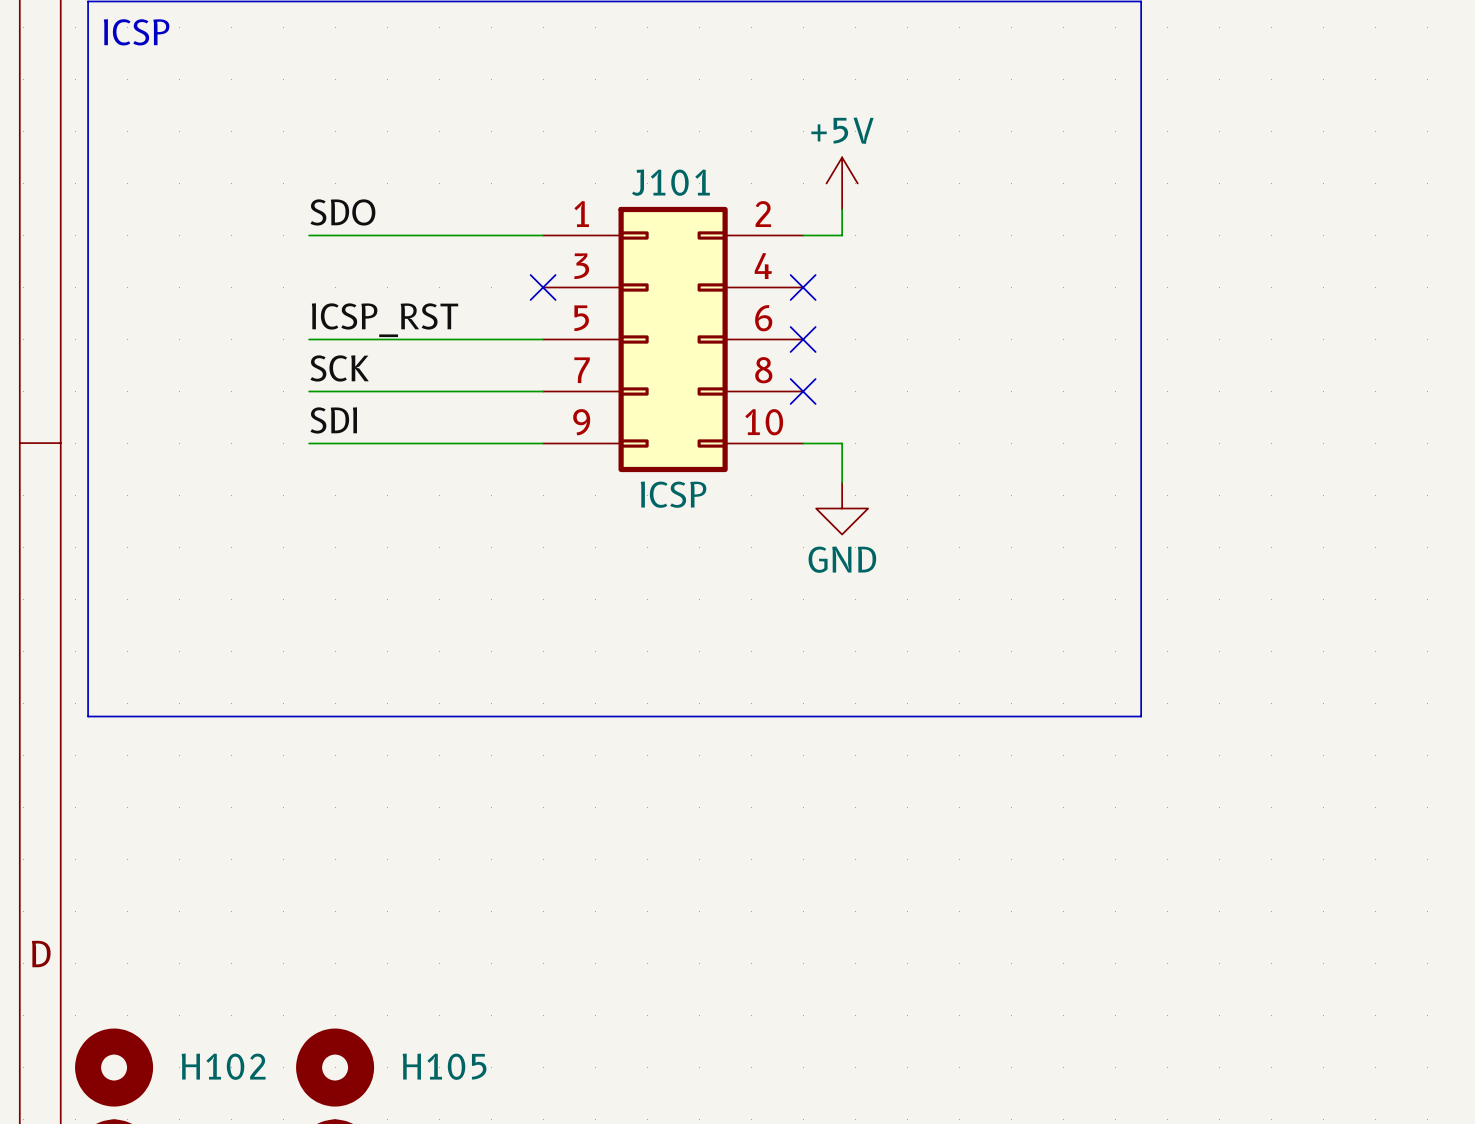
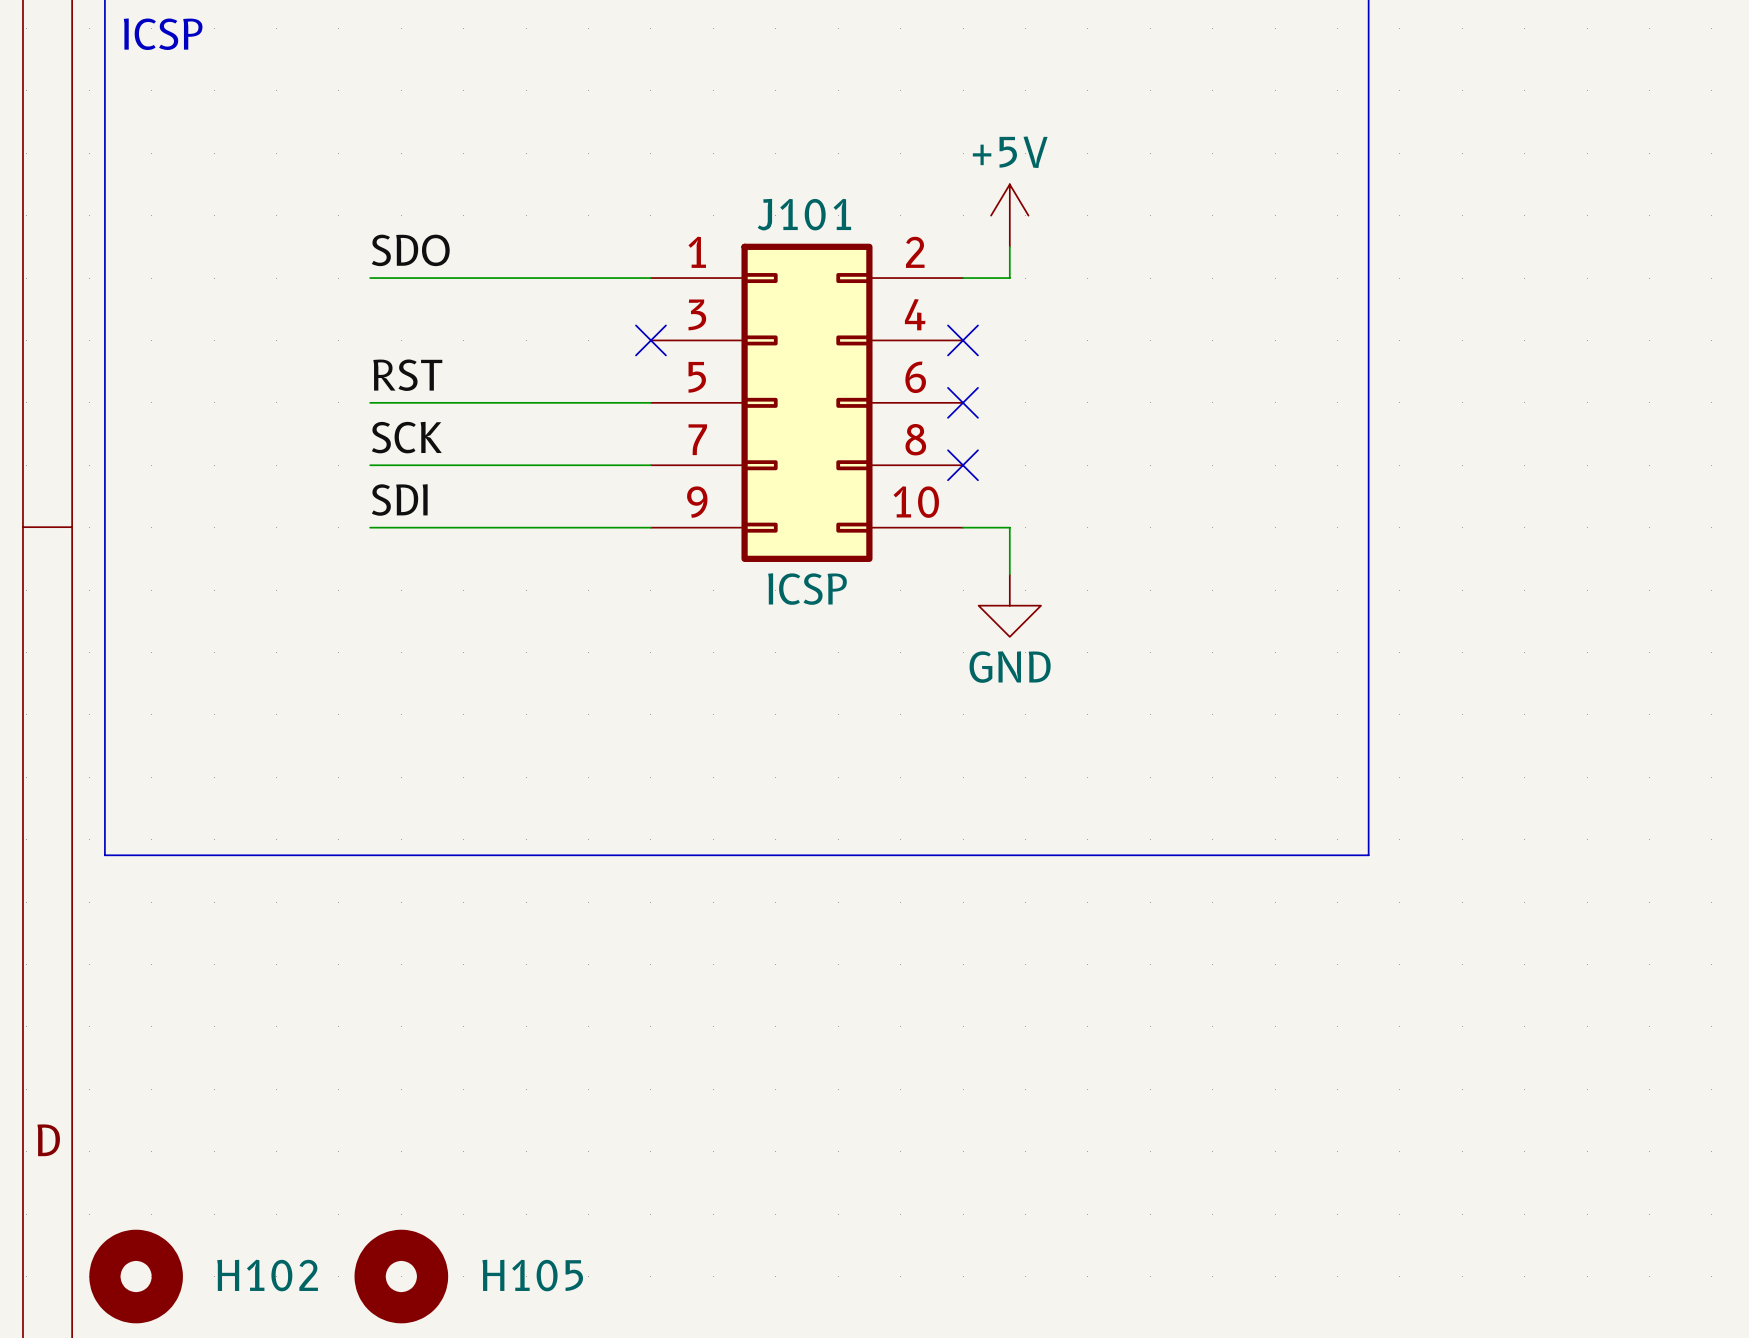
label: ICSP_RST (385, 320) -> RST (407, 375)

